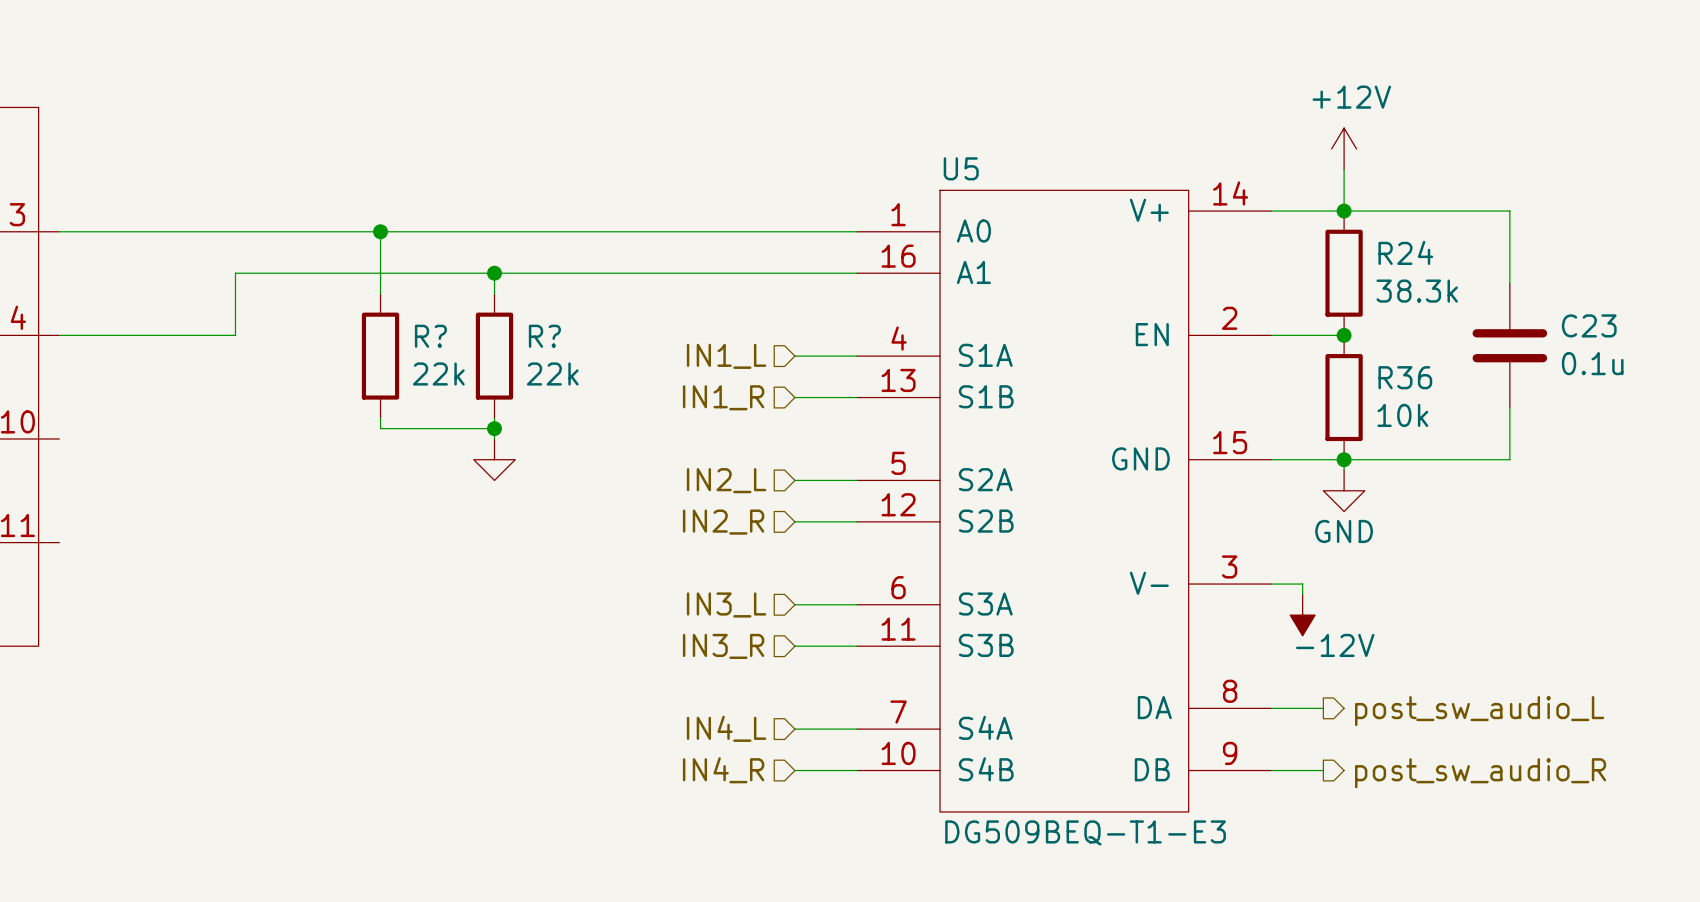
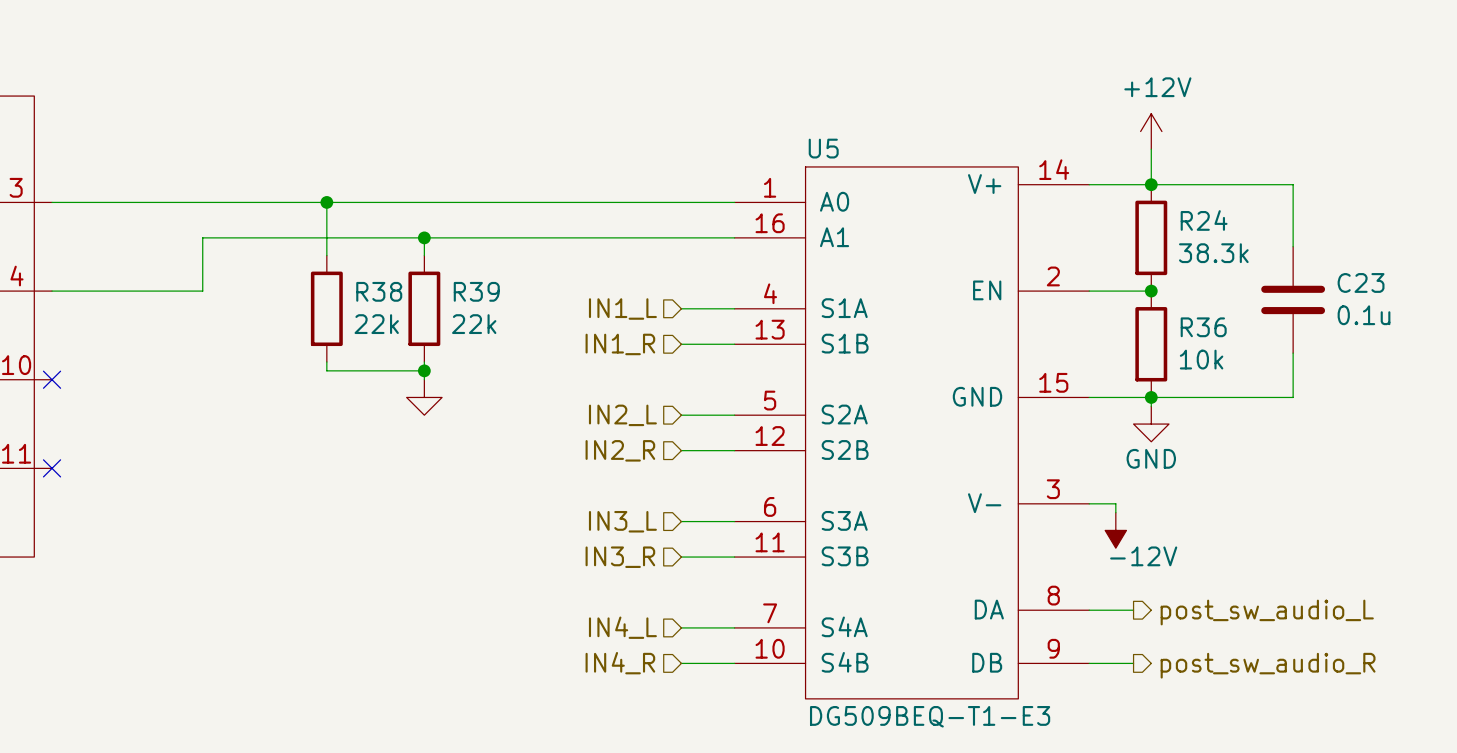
R? name: R? (430, 336) -> R38 (379, 291)
R? name: R? (544, 336) -> R39 (476, 291)
no-connect mark: none -> (52, 379)
no-connect mark: none -> (52, 468)

